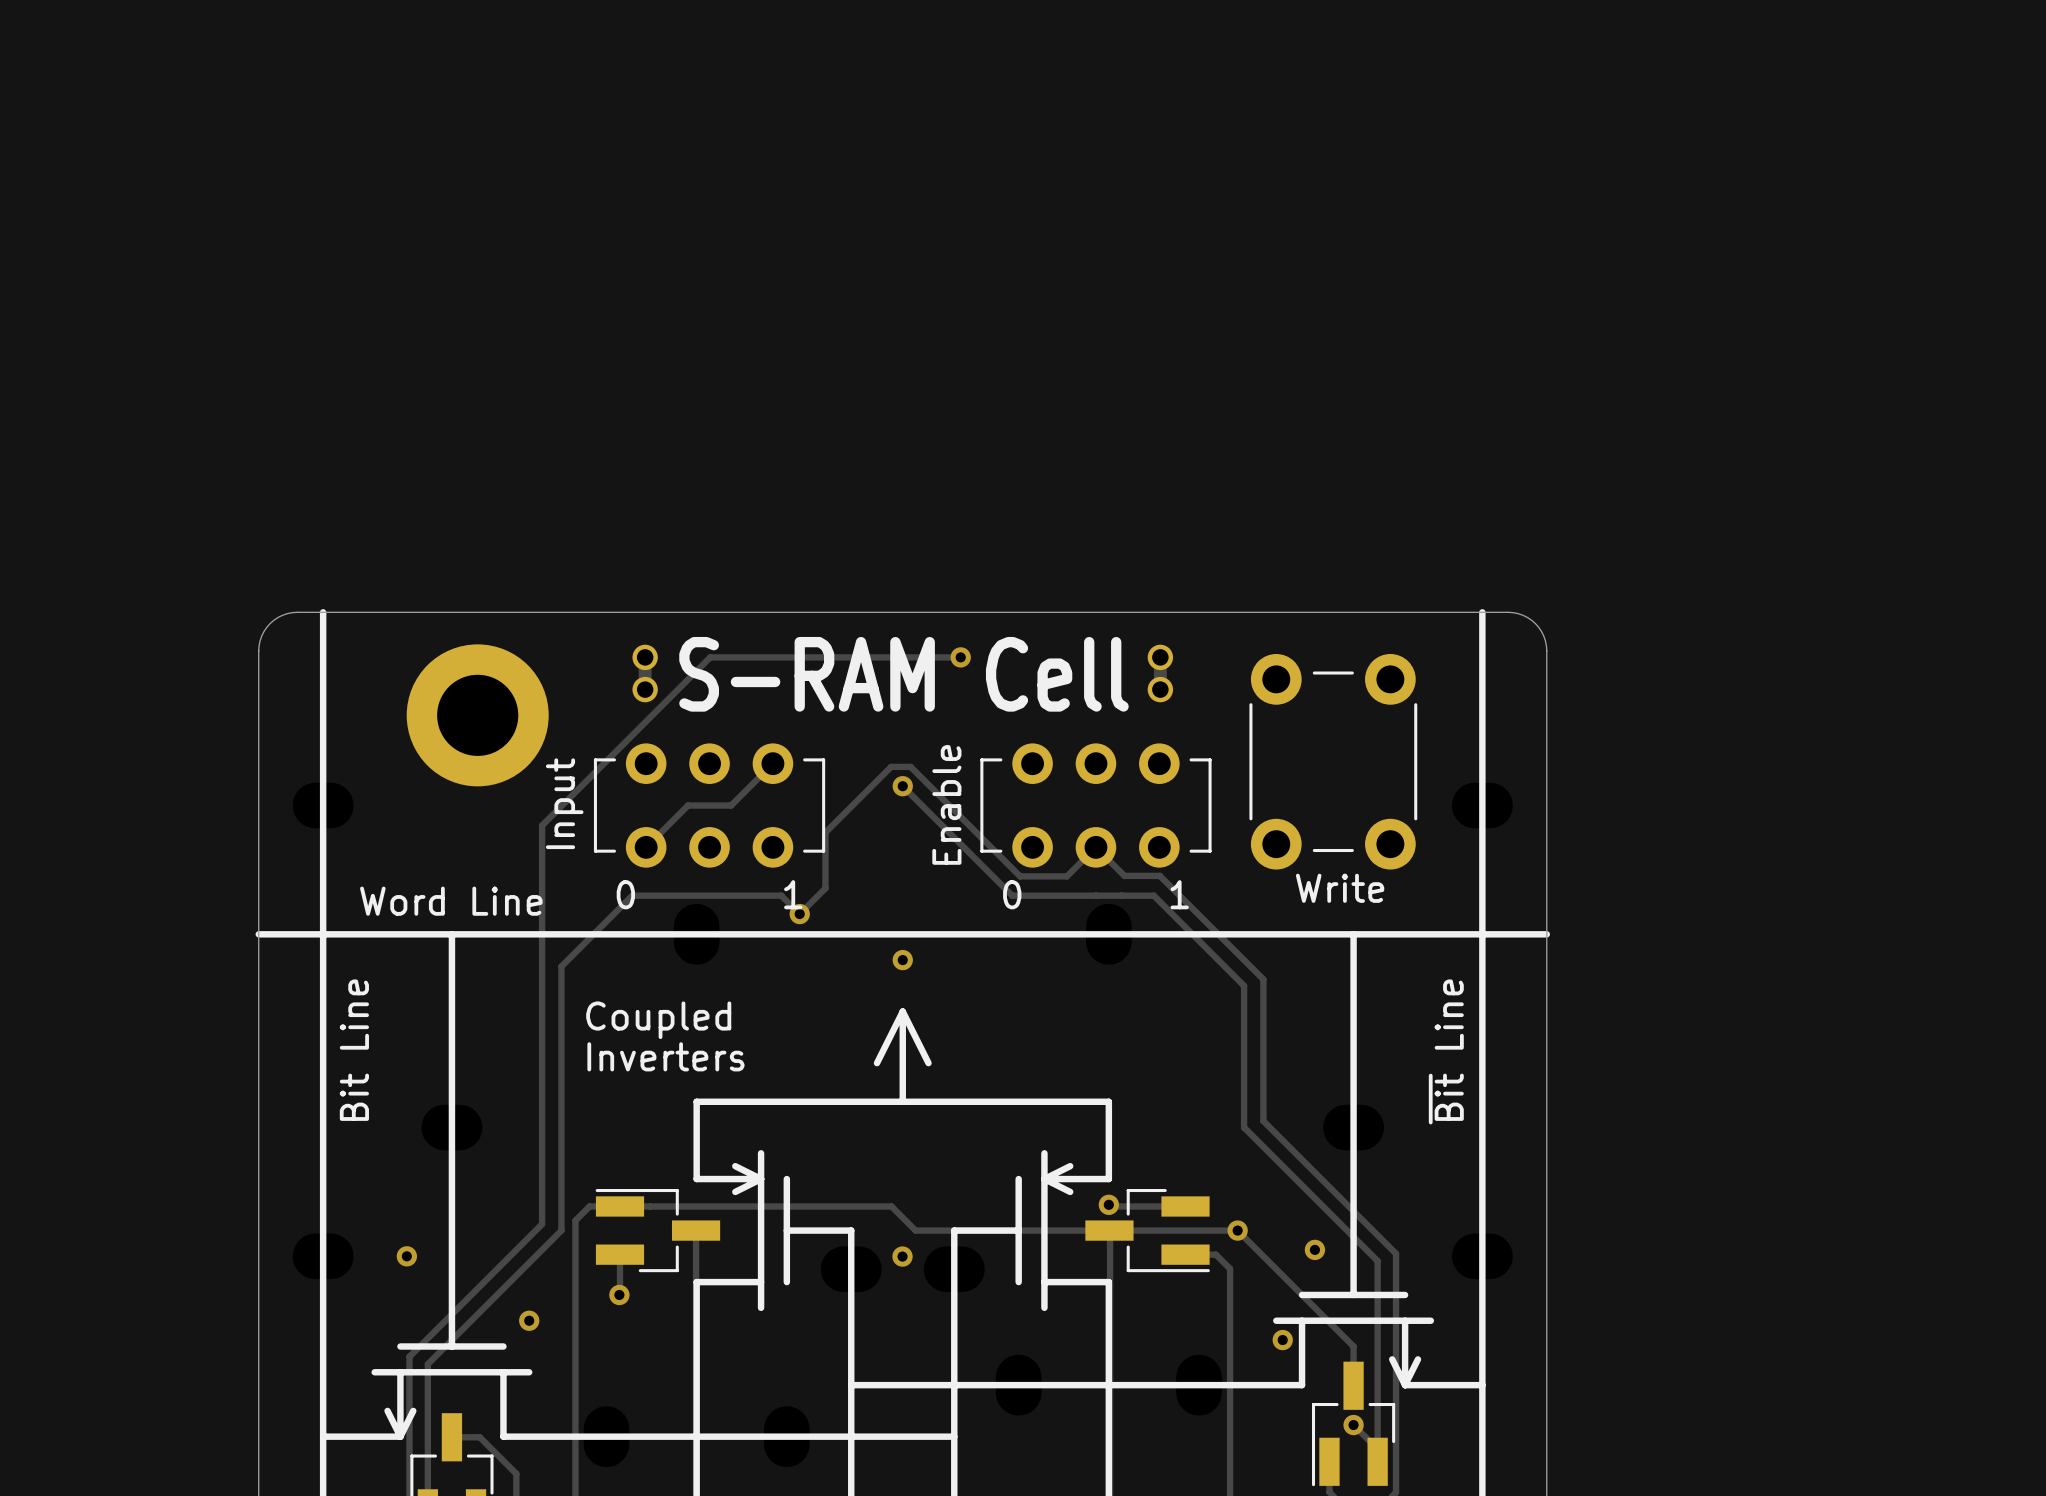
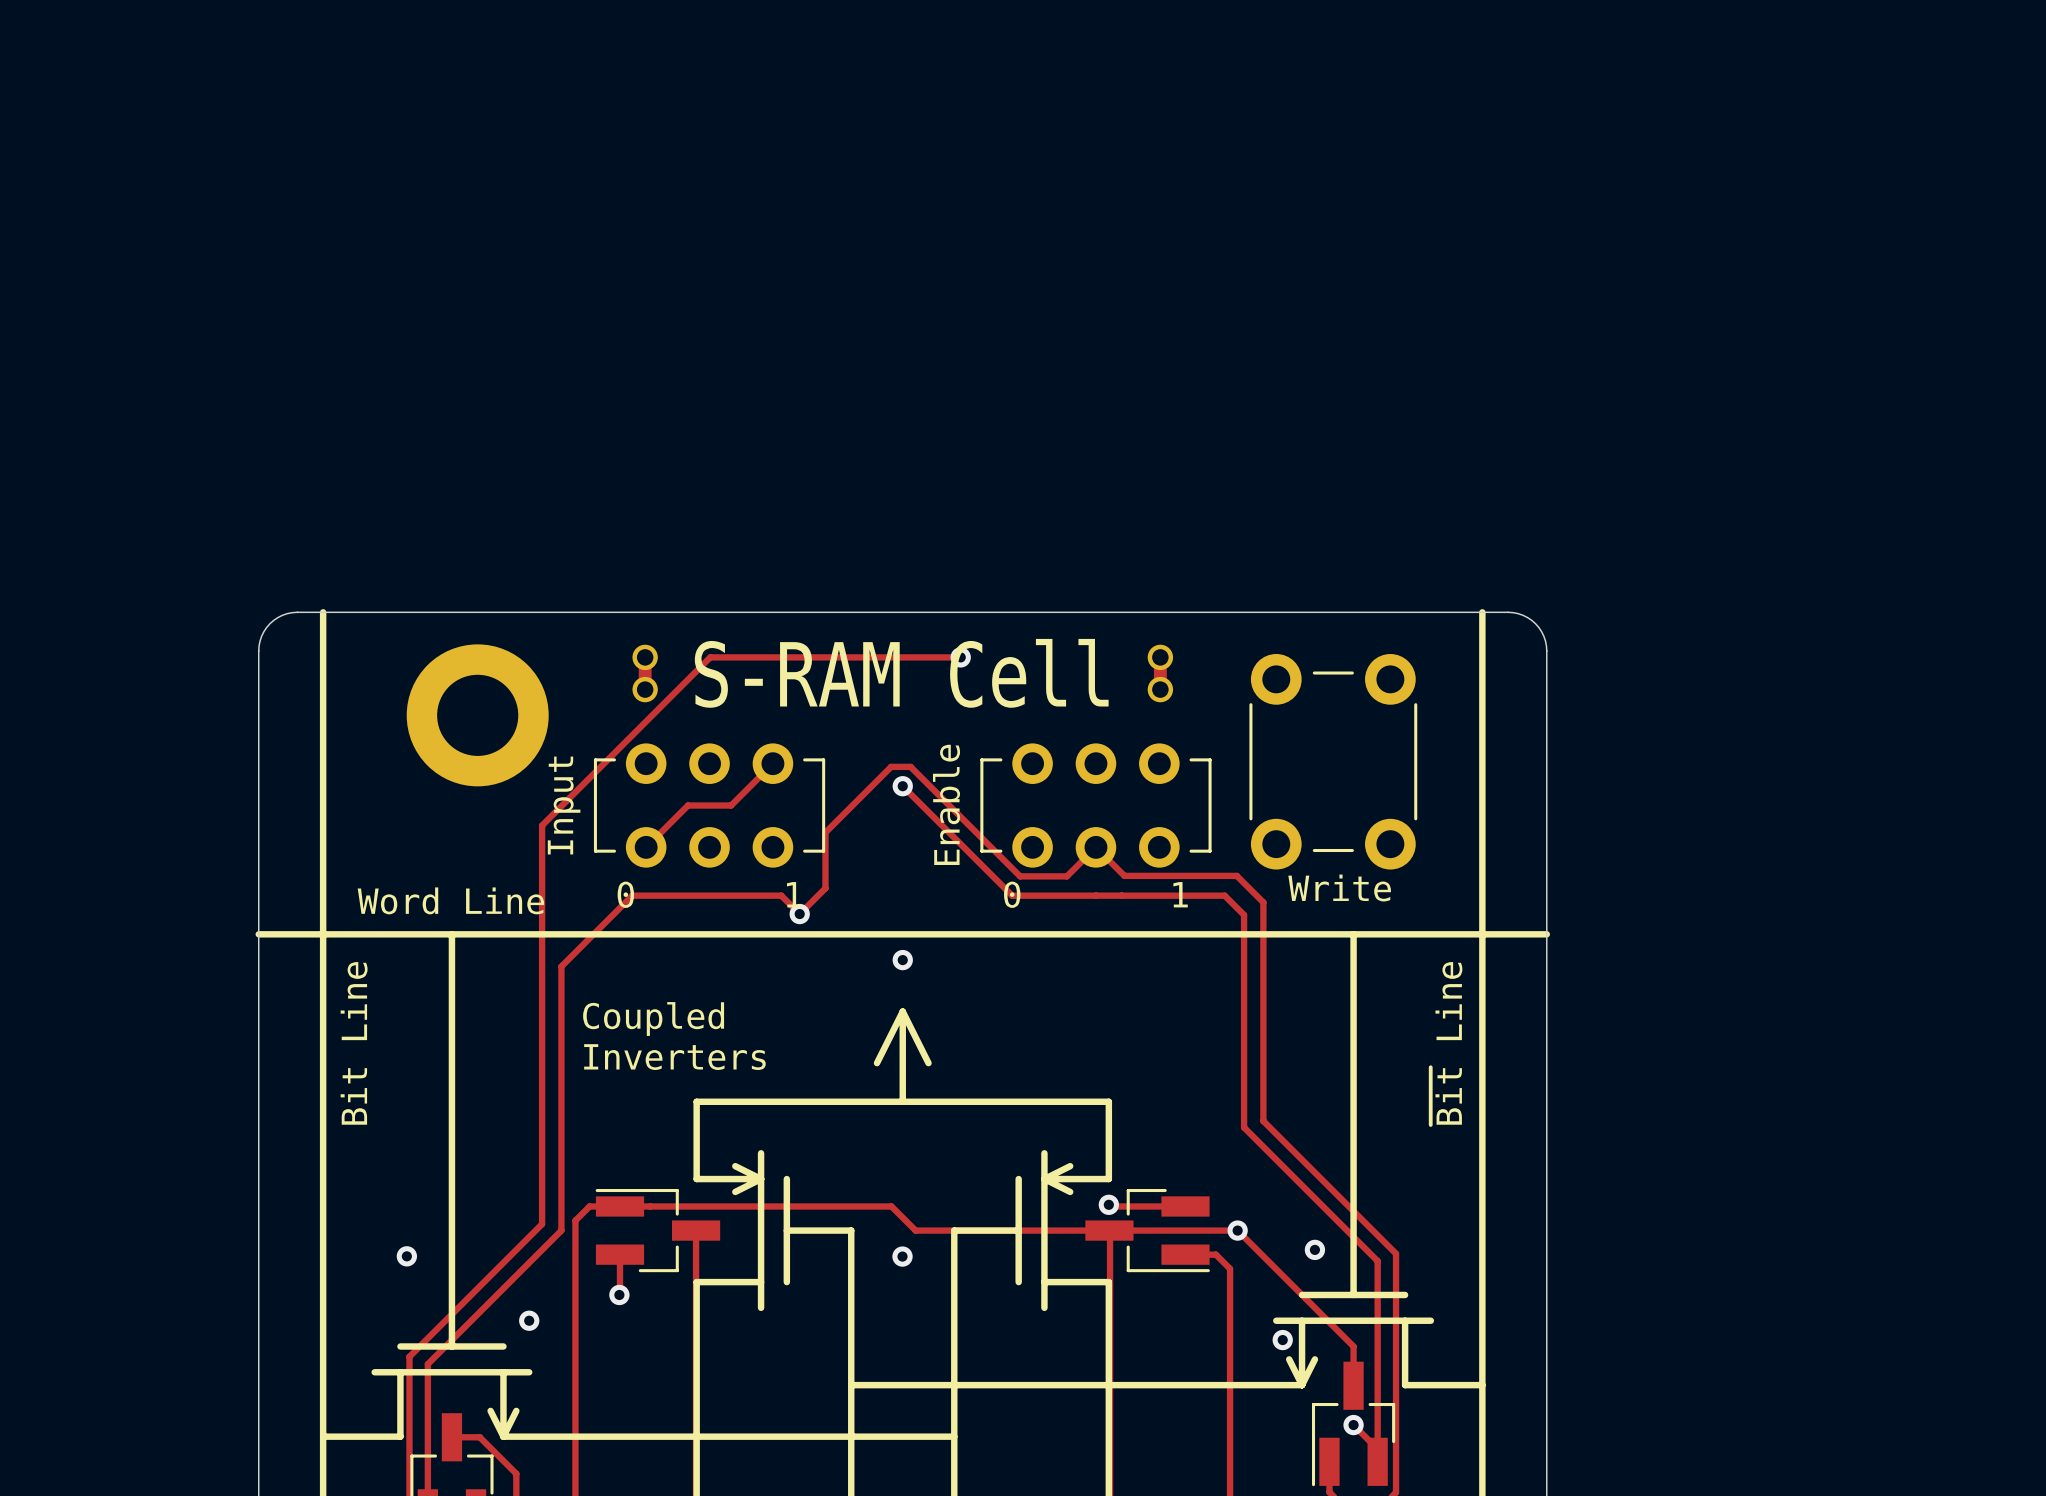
track: (1159, 875) (1263, 979) -> (1159, 875) (1236, 875) (1263, 902) (1263, 979)
track: (1153, 895) (1244, 985) -> (1153, 895) (1224, 895) (1244, 915) (1244, 985)
line: (1392, 1359) (1405, 1385) (1417, 1359) -> (1289, 1359) (1302, 1385) (1314, 1359)
line: (387, 1410) (400, 1436) (413, 1410) -> (490, 1410) (503, 1436) (516, 1410)

